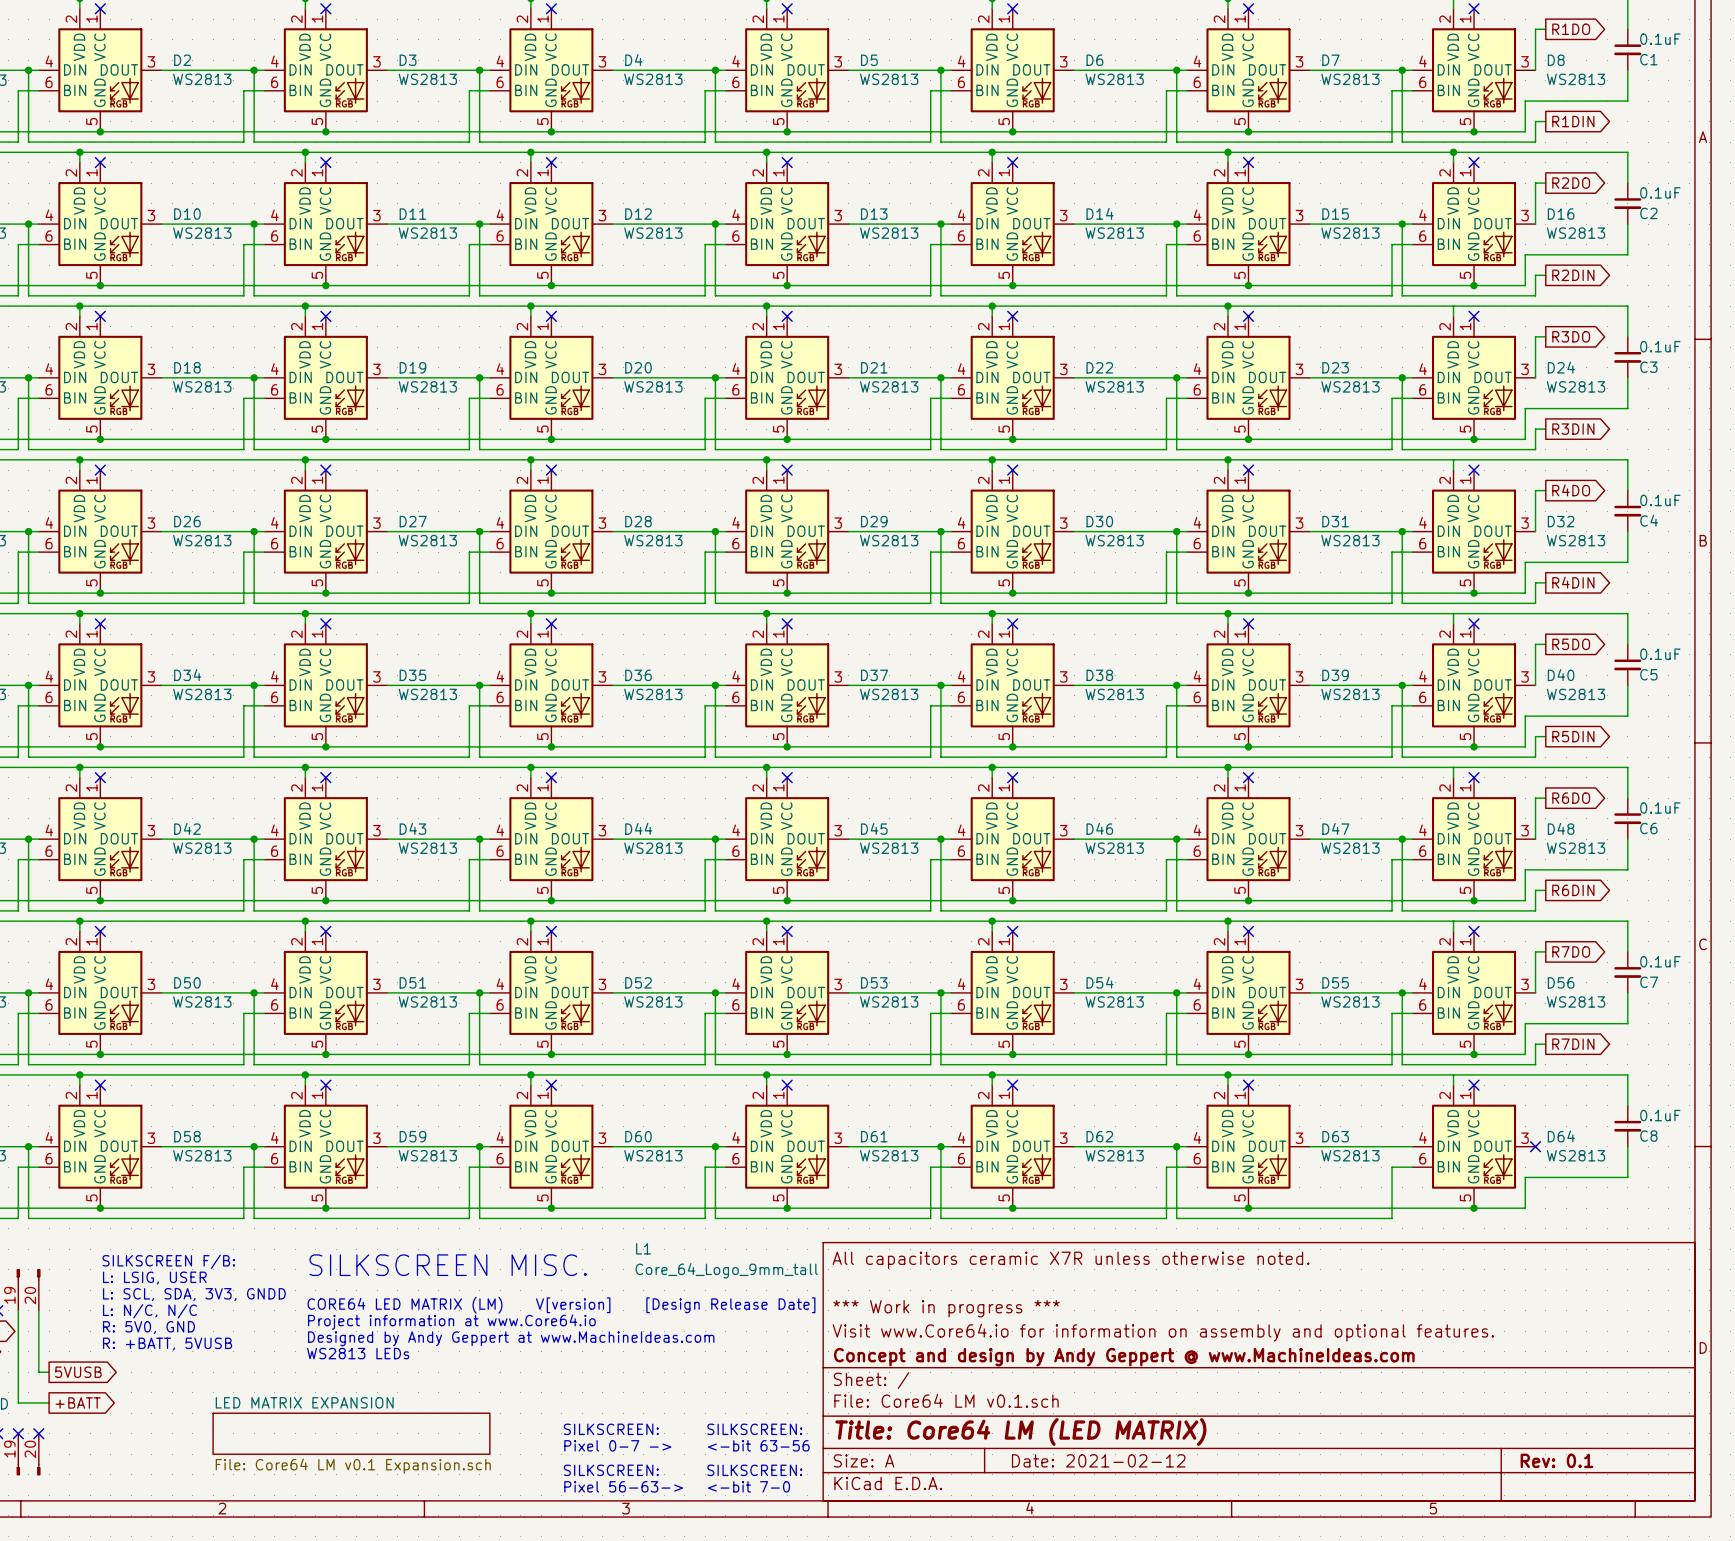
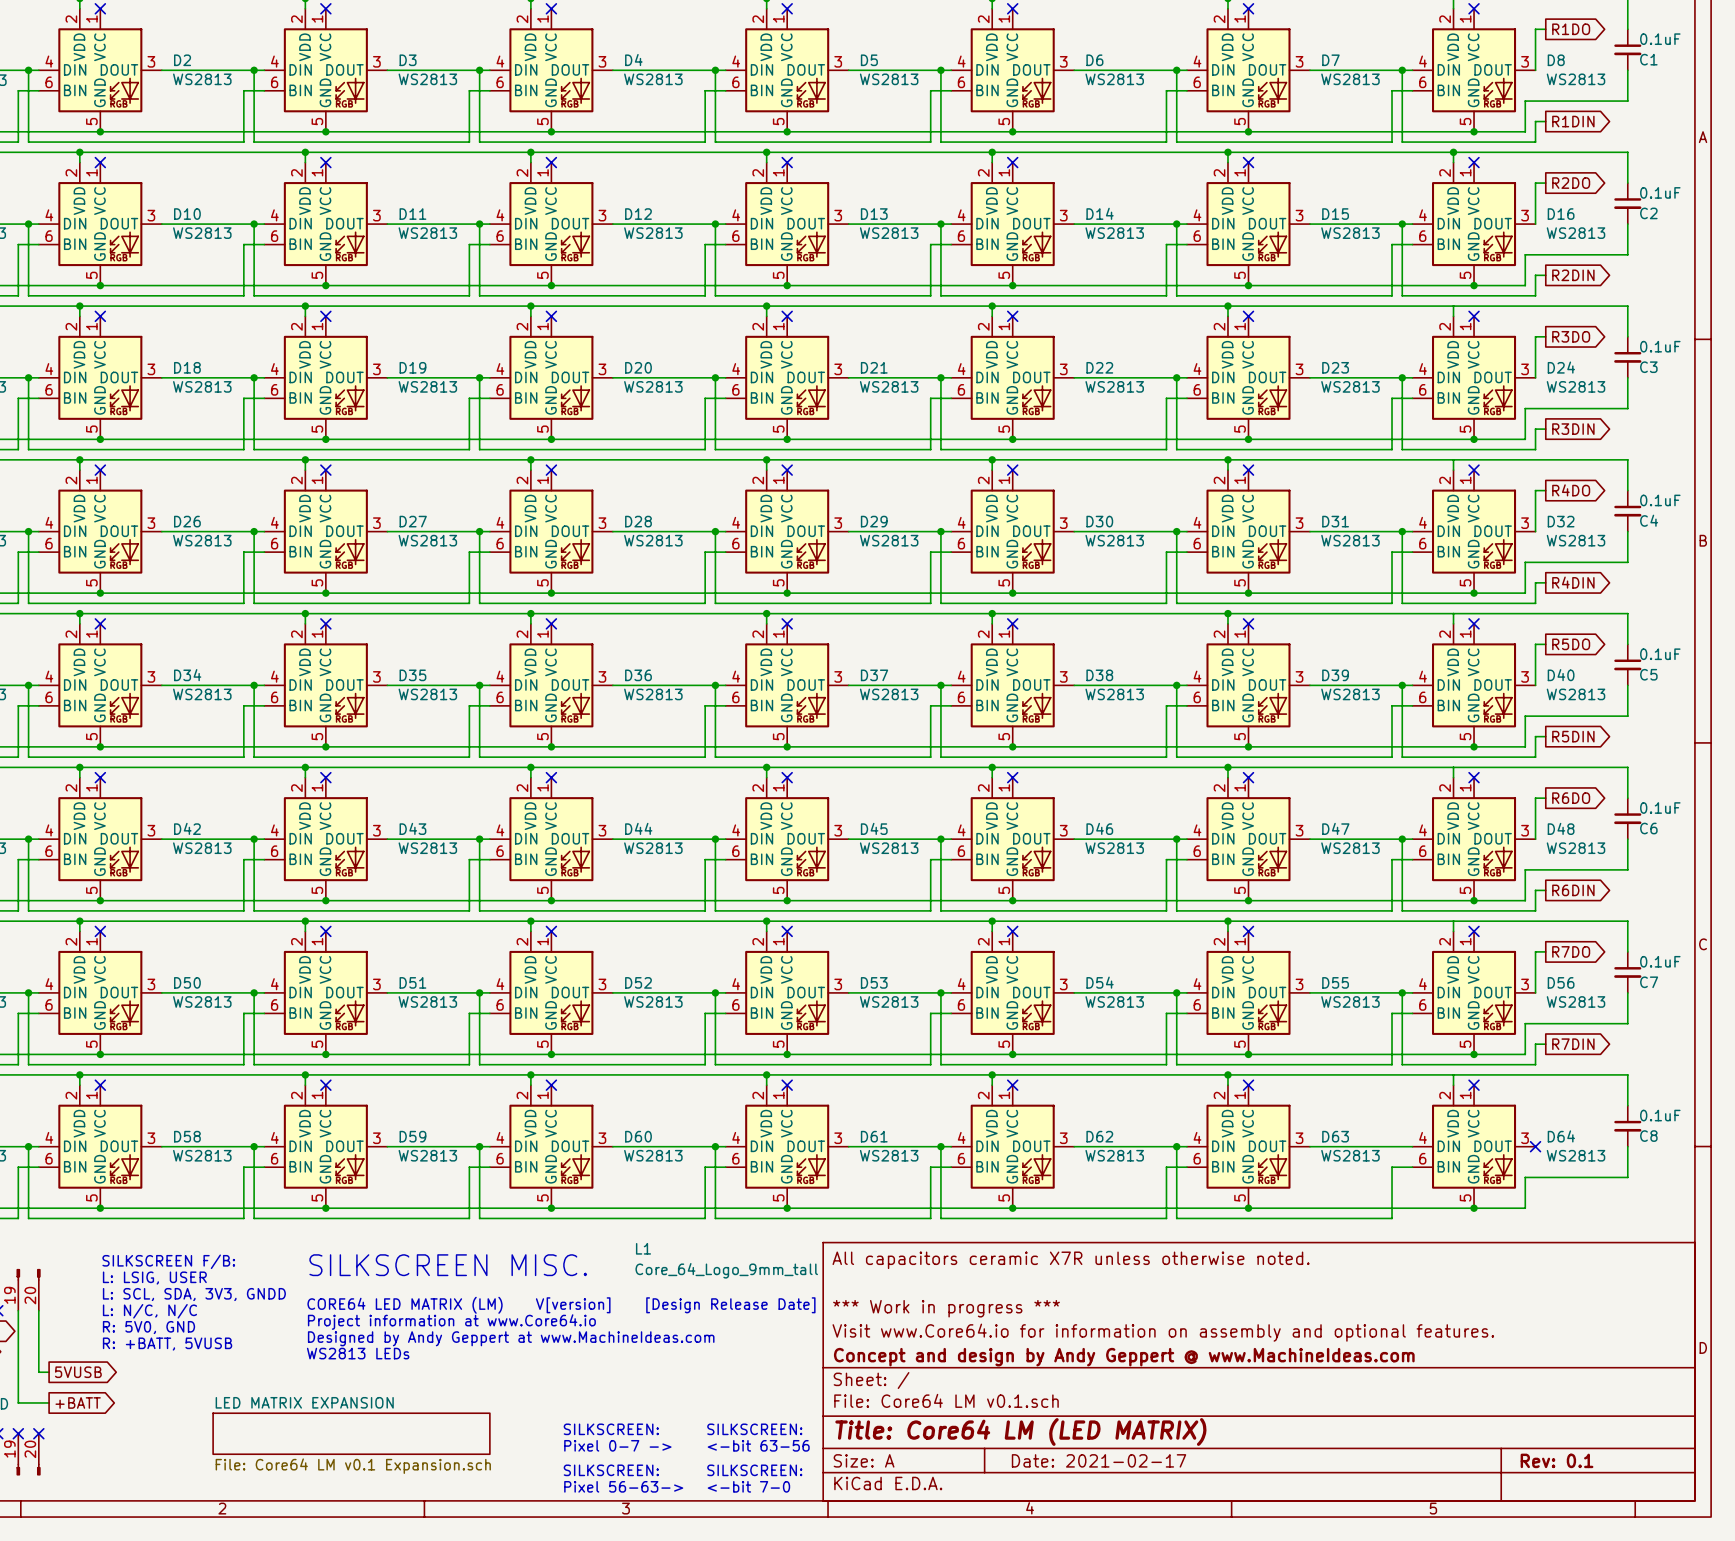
title block: Date: 2021-02-12 (1098, 1460) -> Date: 2021-02-17 (1099, 1460)

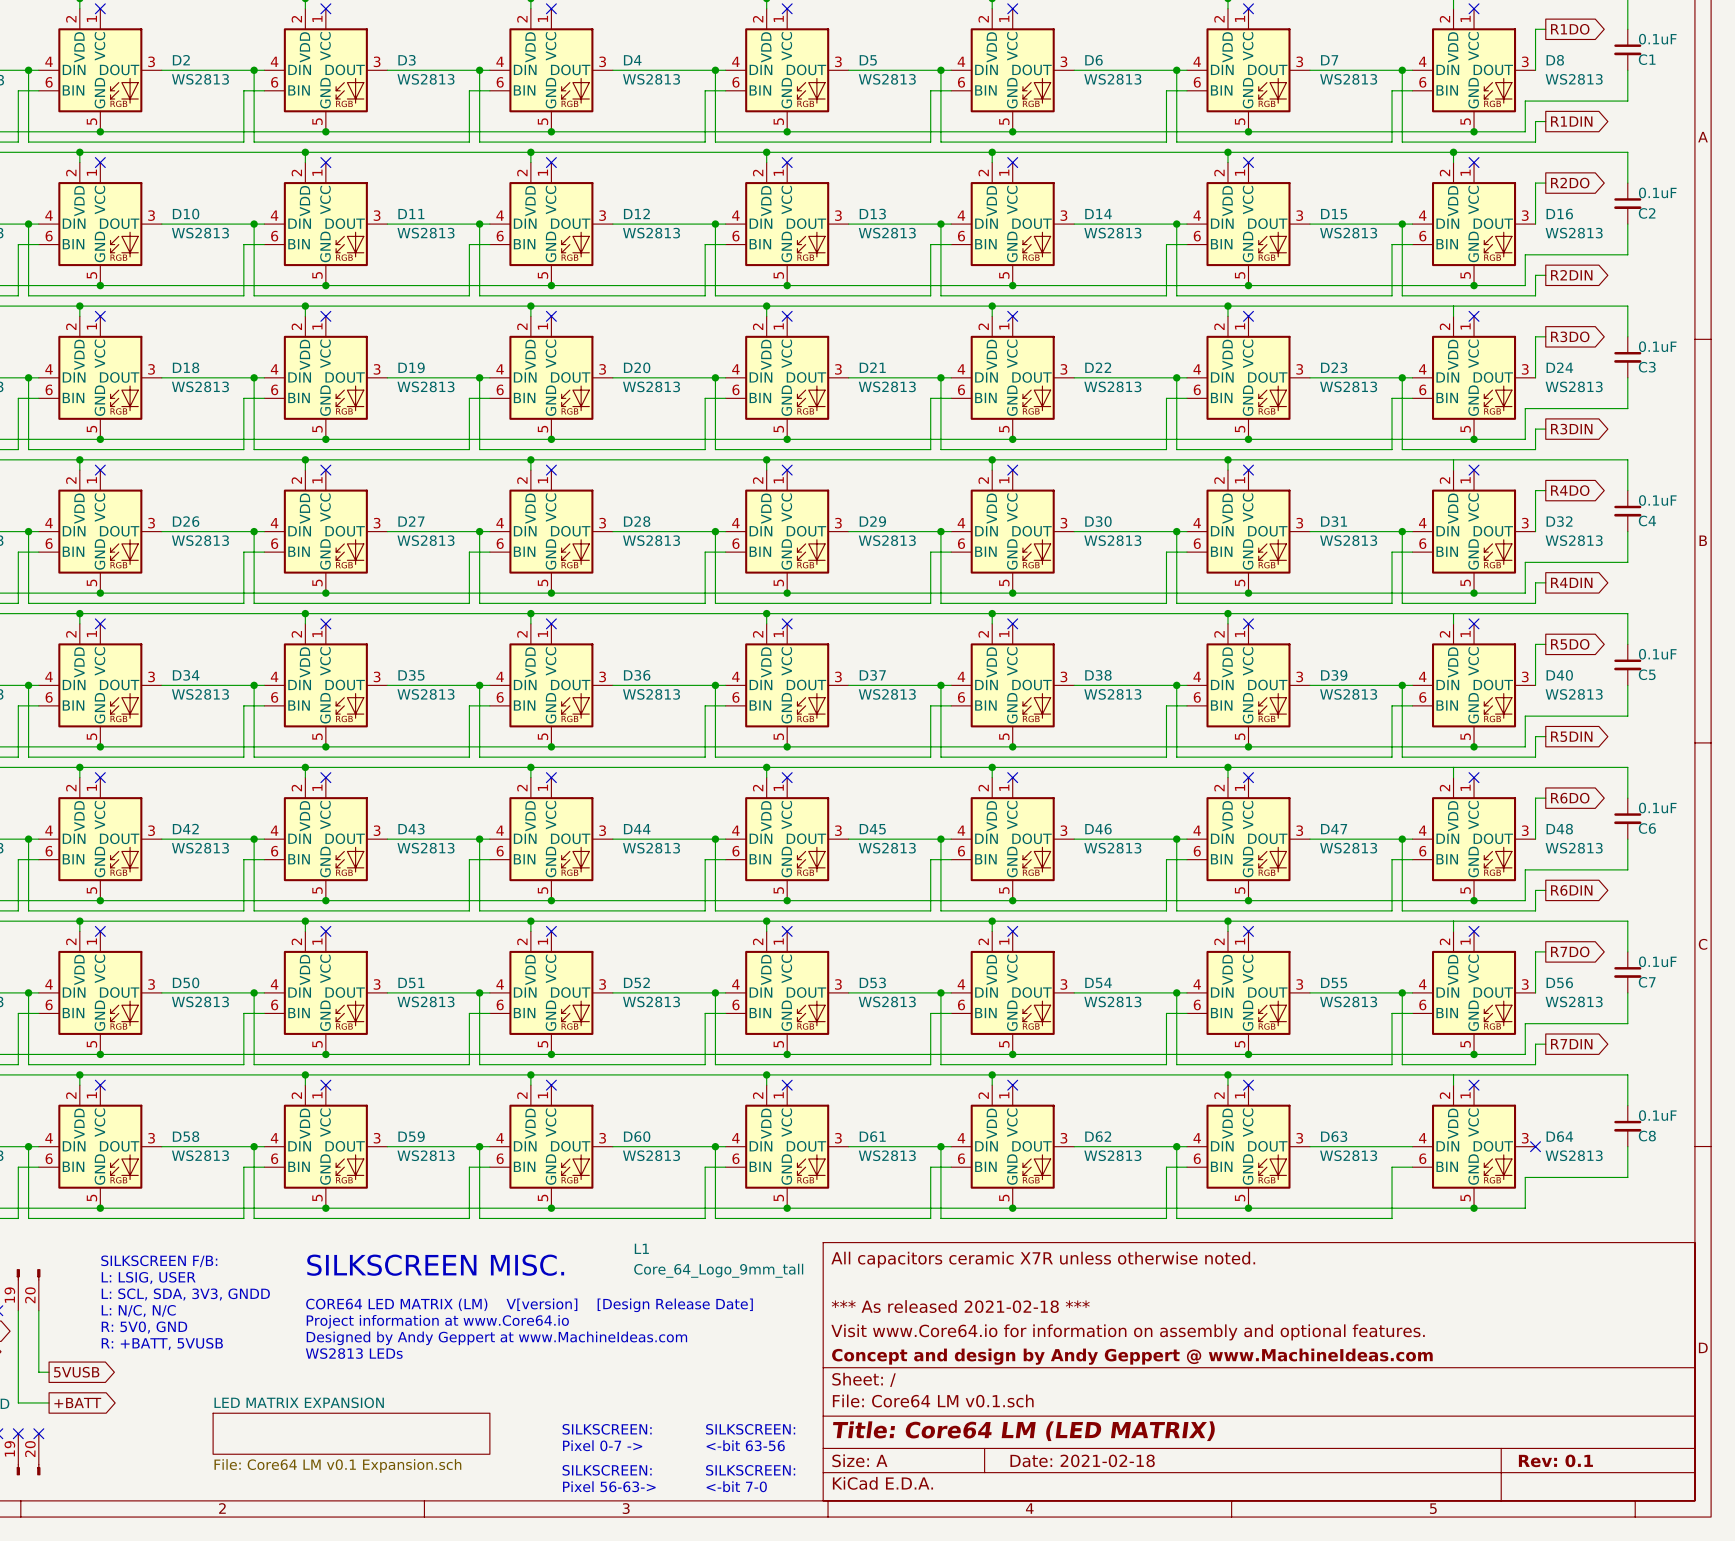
title block: *** Work in progress *** (946, 1308) -> *** As released 2021-02-18 *** (960, 1306)
title block: Date: 2021-02-17 (1099, 1460) -> Date: 2021-02-18 (1082, 1460)

